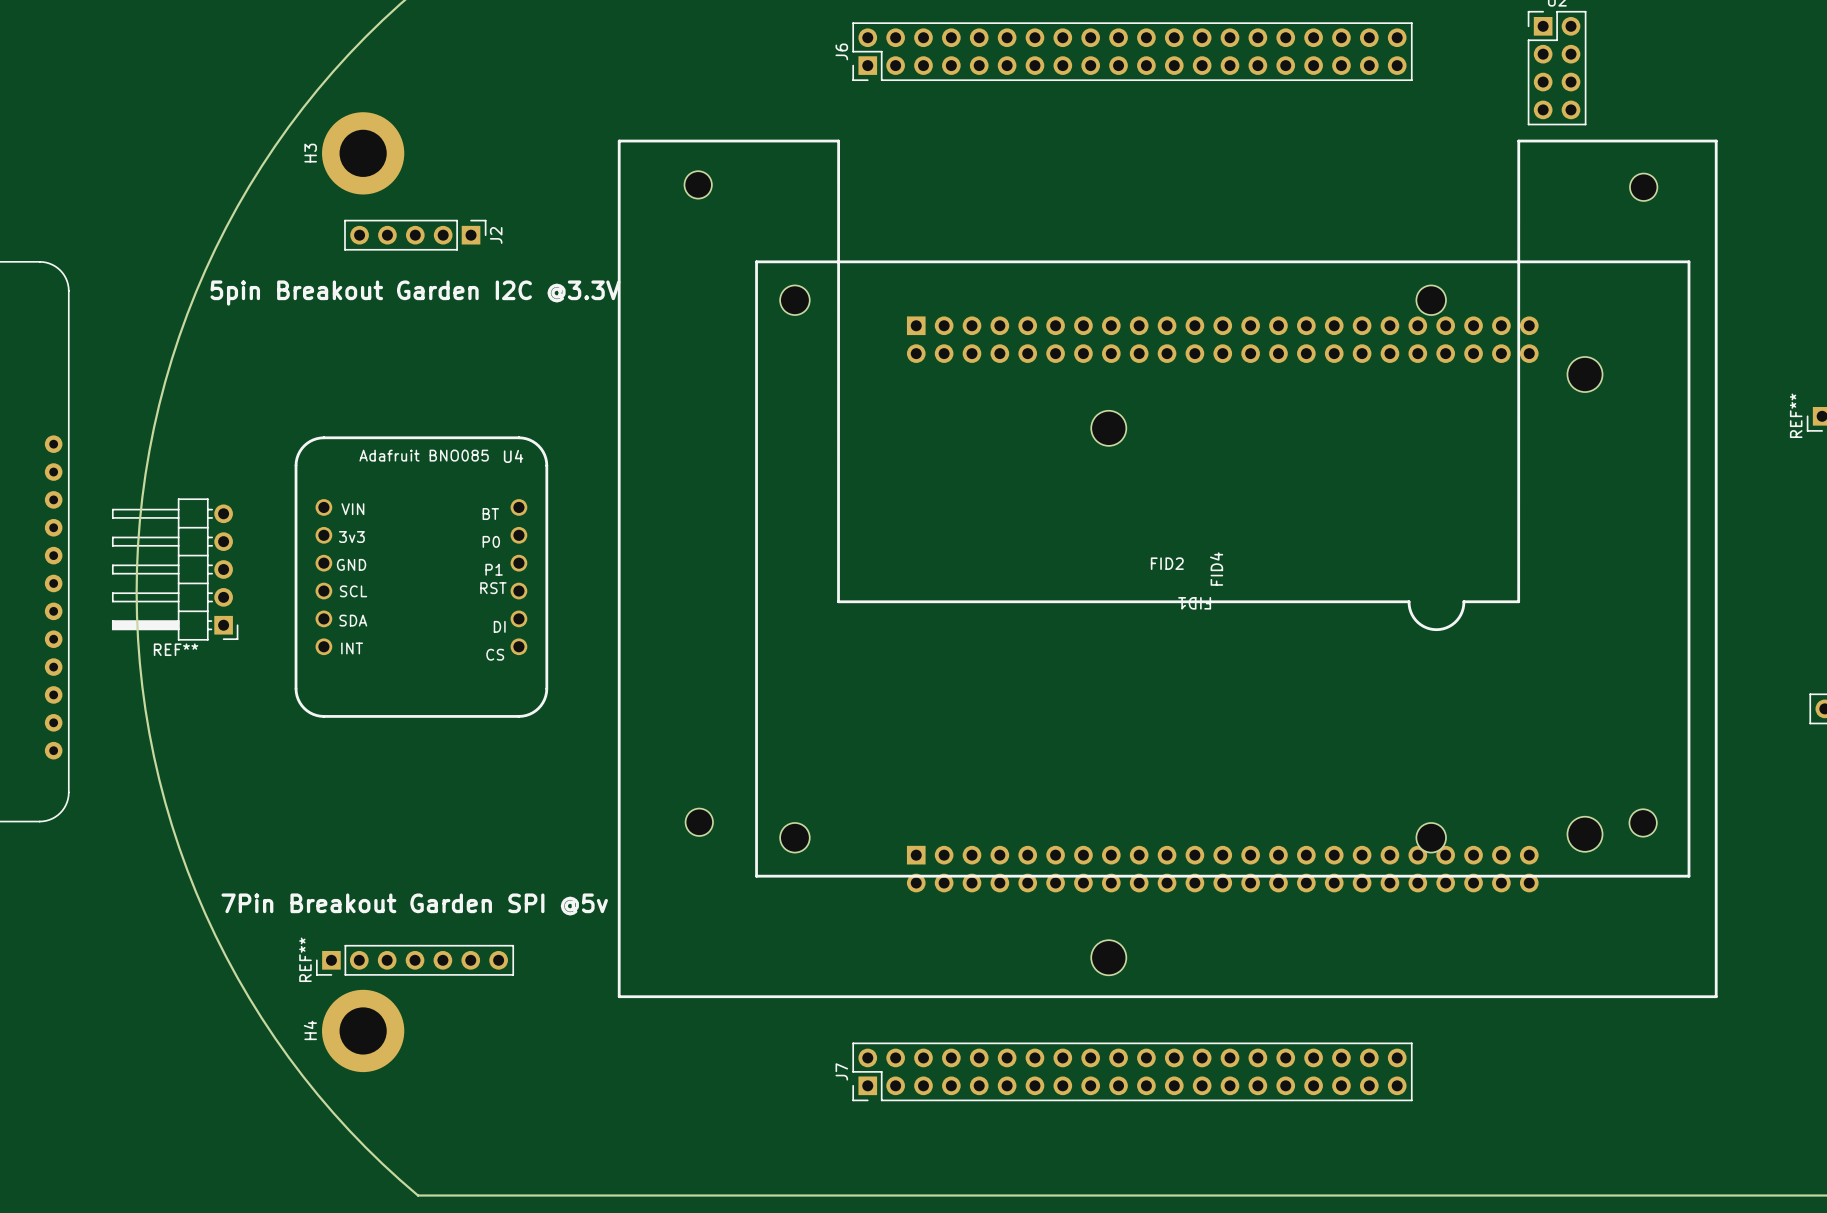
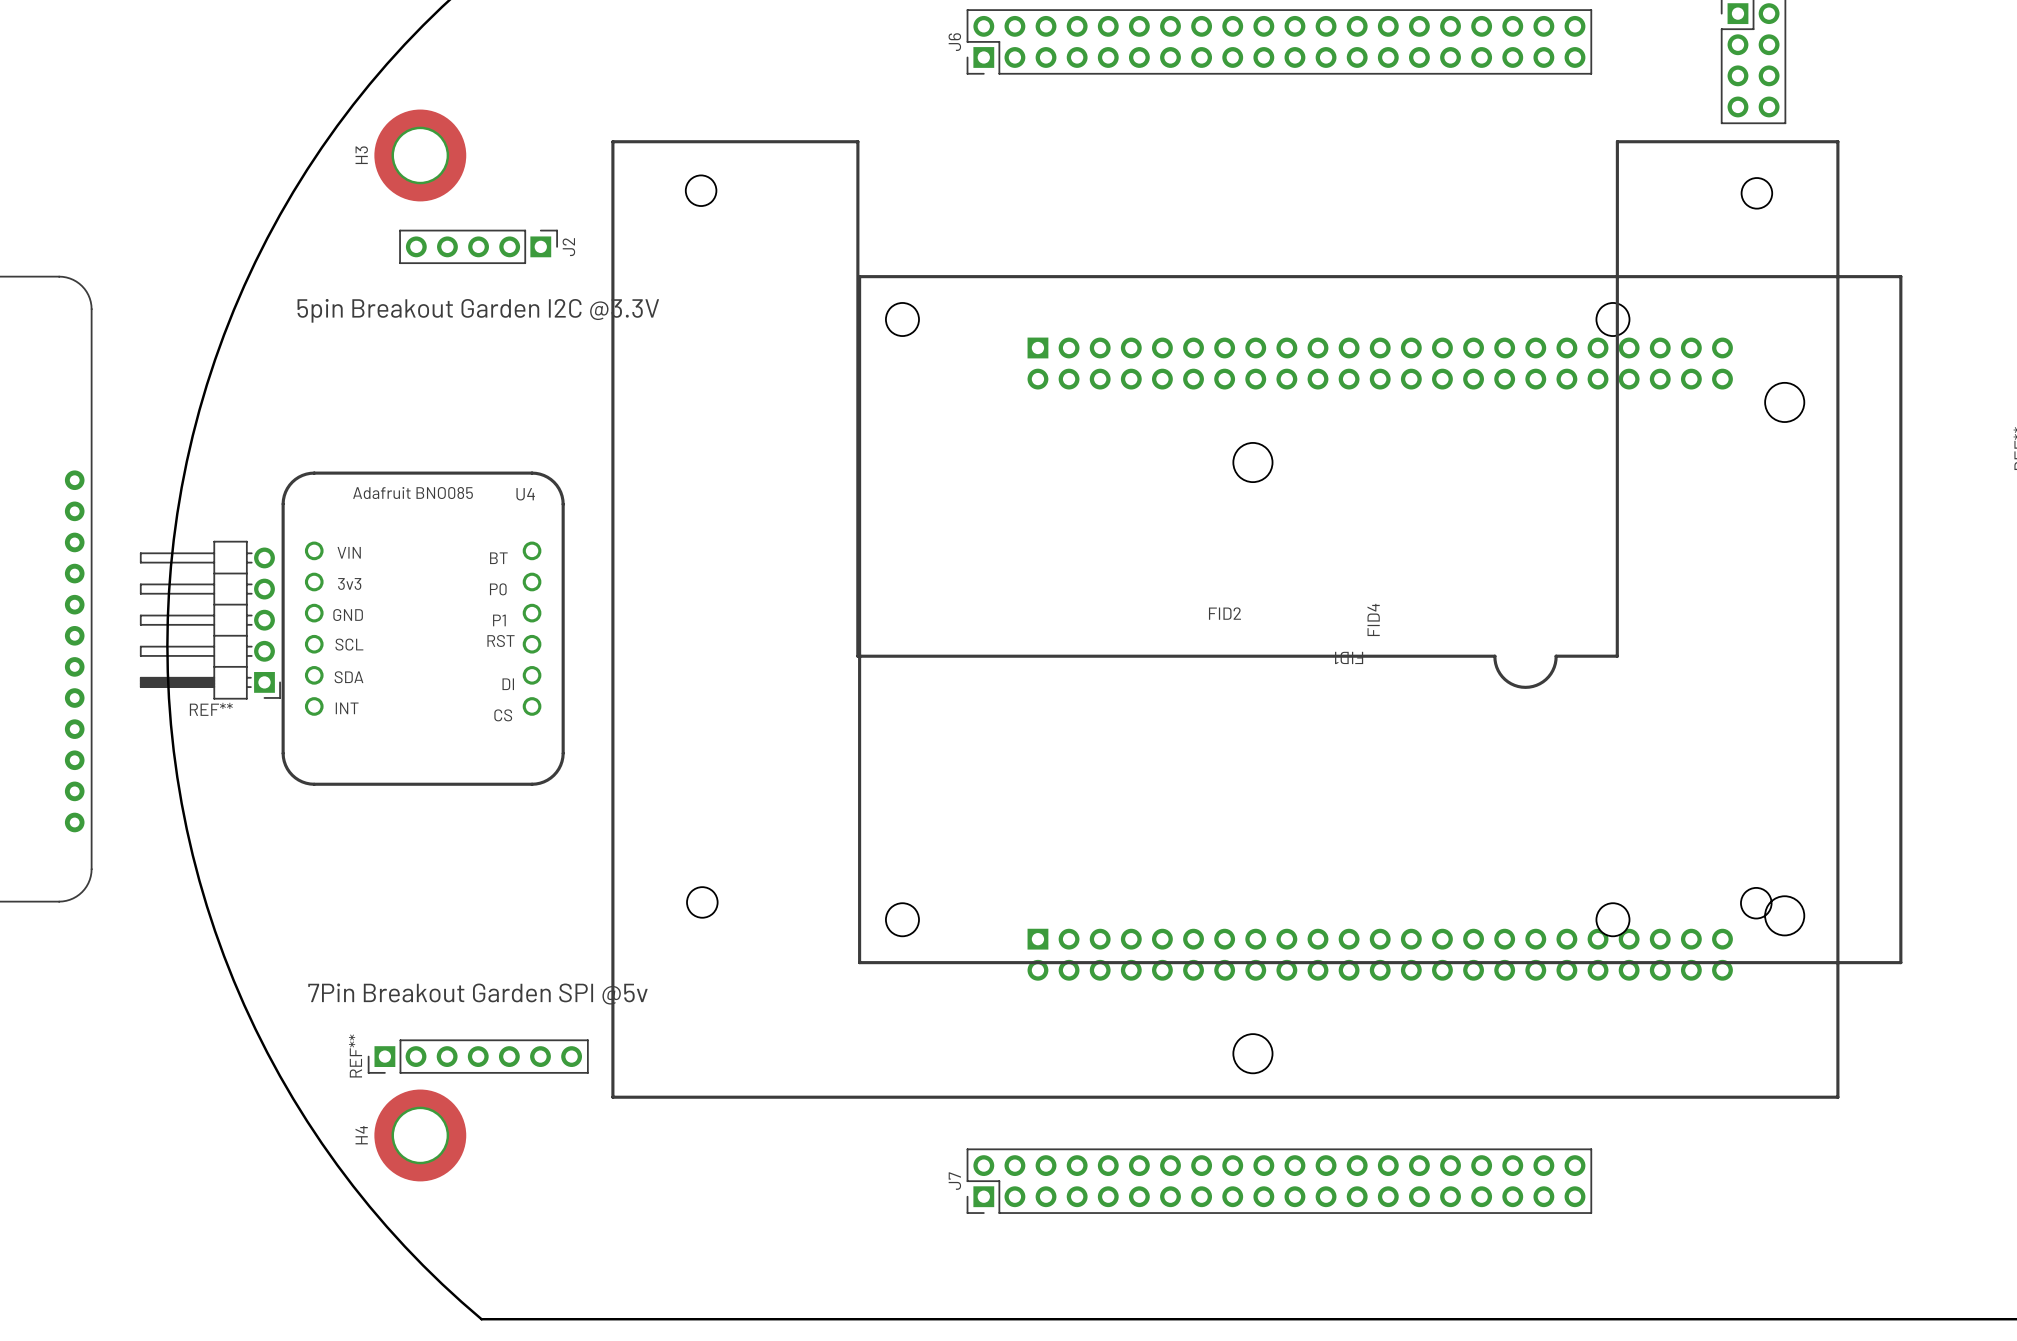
FID2 position: (1167, 568) -> (1225, 619)
U4 position: (421, 577) -> (423, 628)

